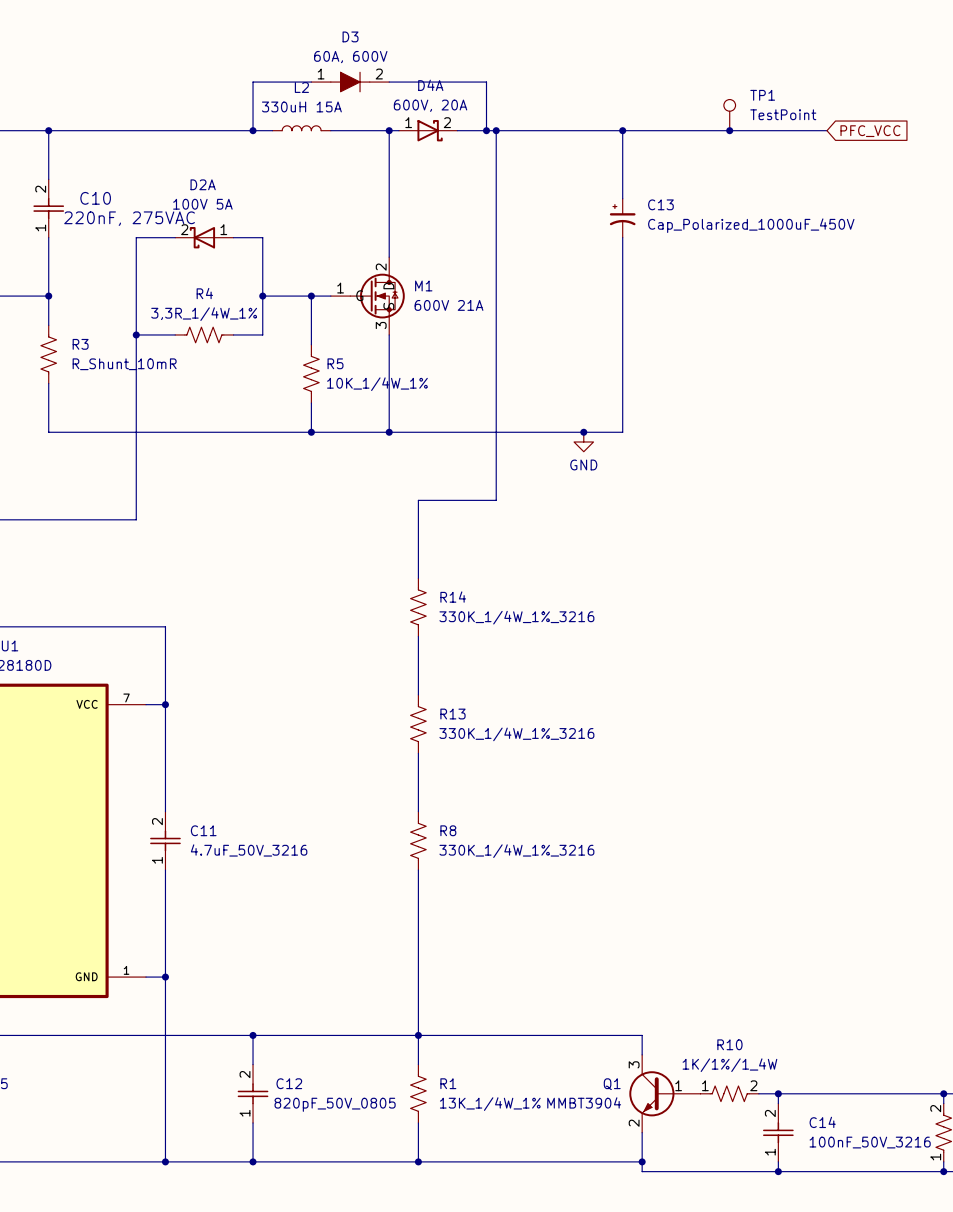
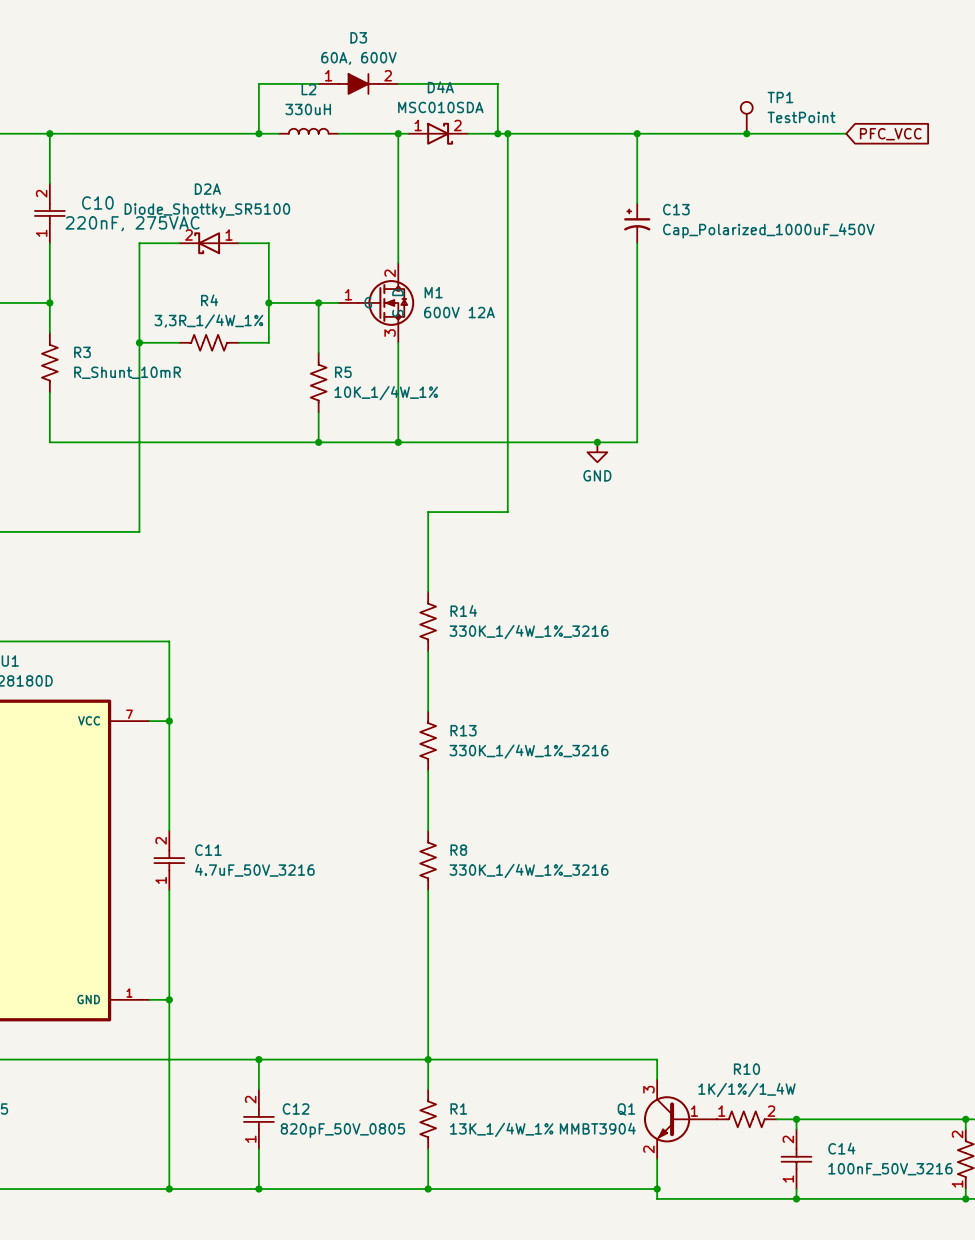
D4A value: 600V, 20A (430, 105) -> MSC010SDA (440, 107)
L2 value: 330uH 15A (301, 106) -> 330uH (308, 109)
D2A value: 100V 5A (202, 204) -> Diode_Shottky_SR5100 (207, 210)
M1 value: 600V 21A (449, 305) -> 600V 12A (459, 312)

